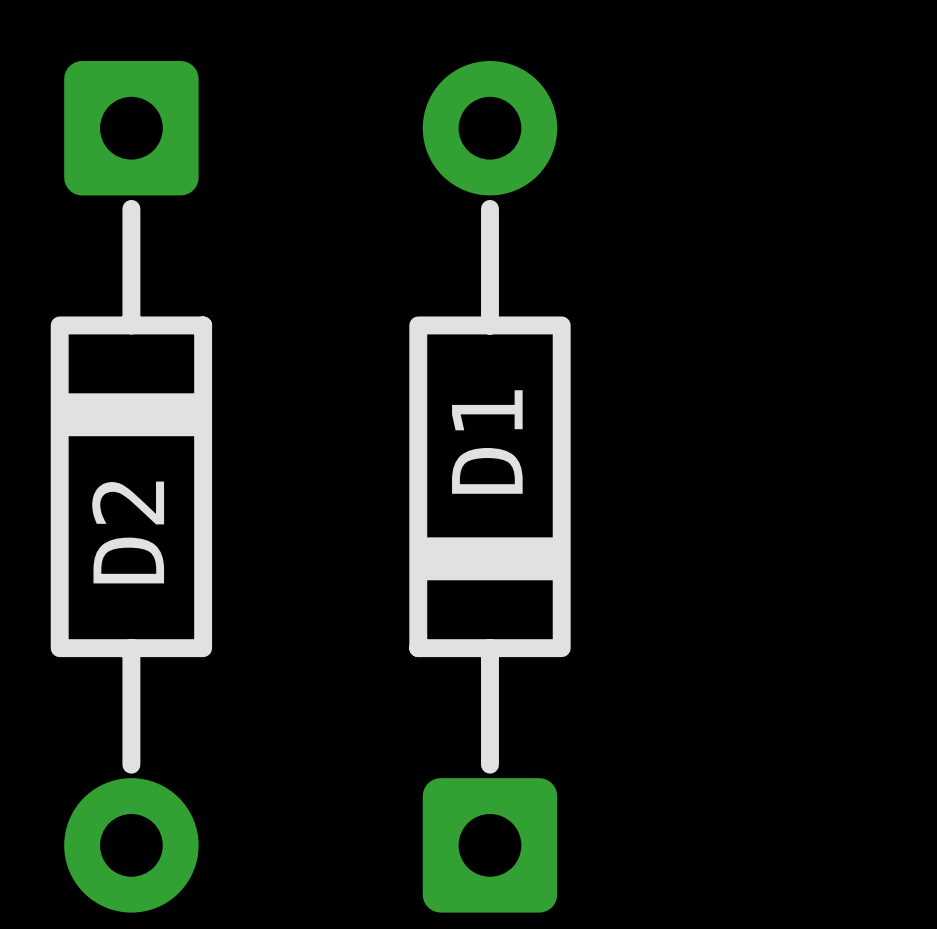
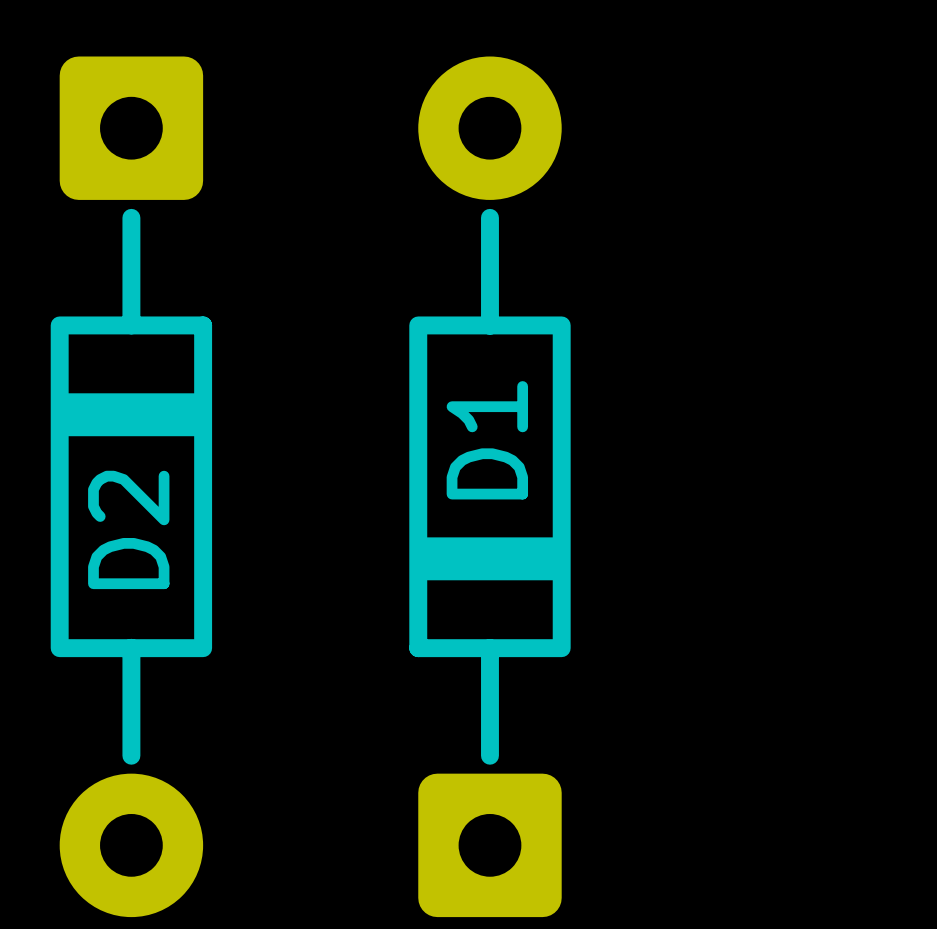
D2 footprint: [50, 60, 213, 913] -> [50, 56, 213, 918]
D1 footprint: [409, 60, 571, 913] -> [409, 56, 571, 918]

